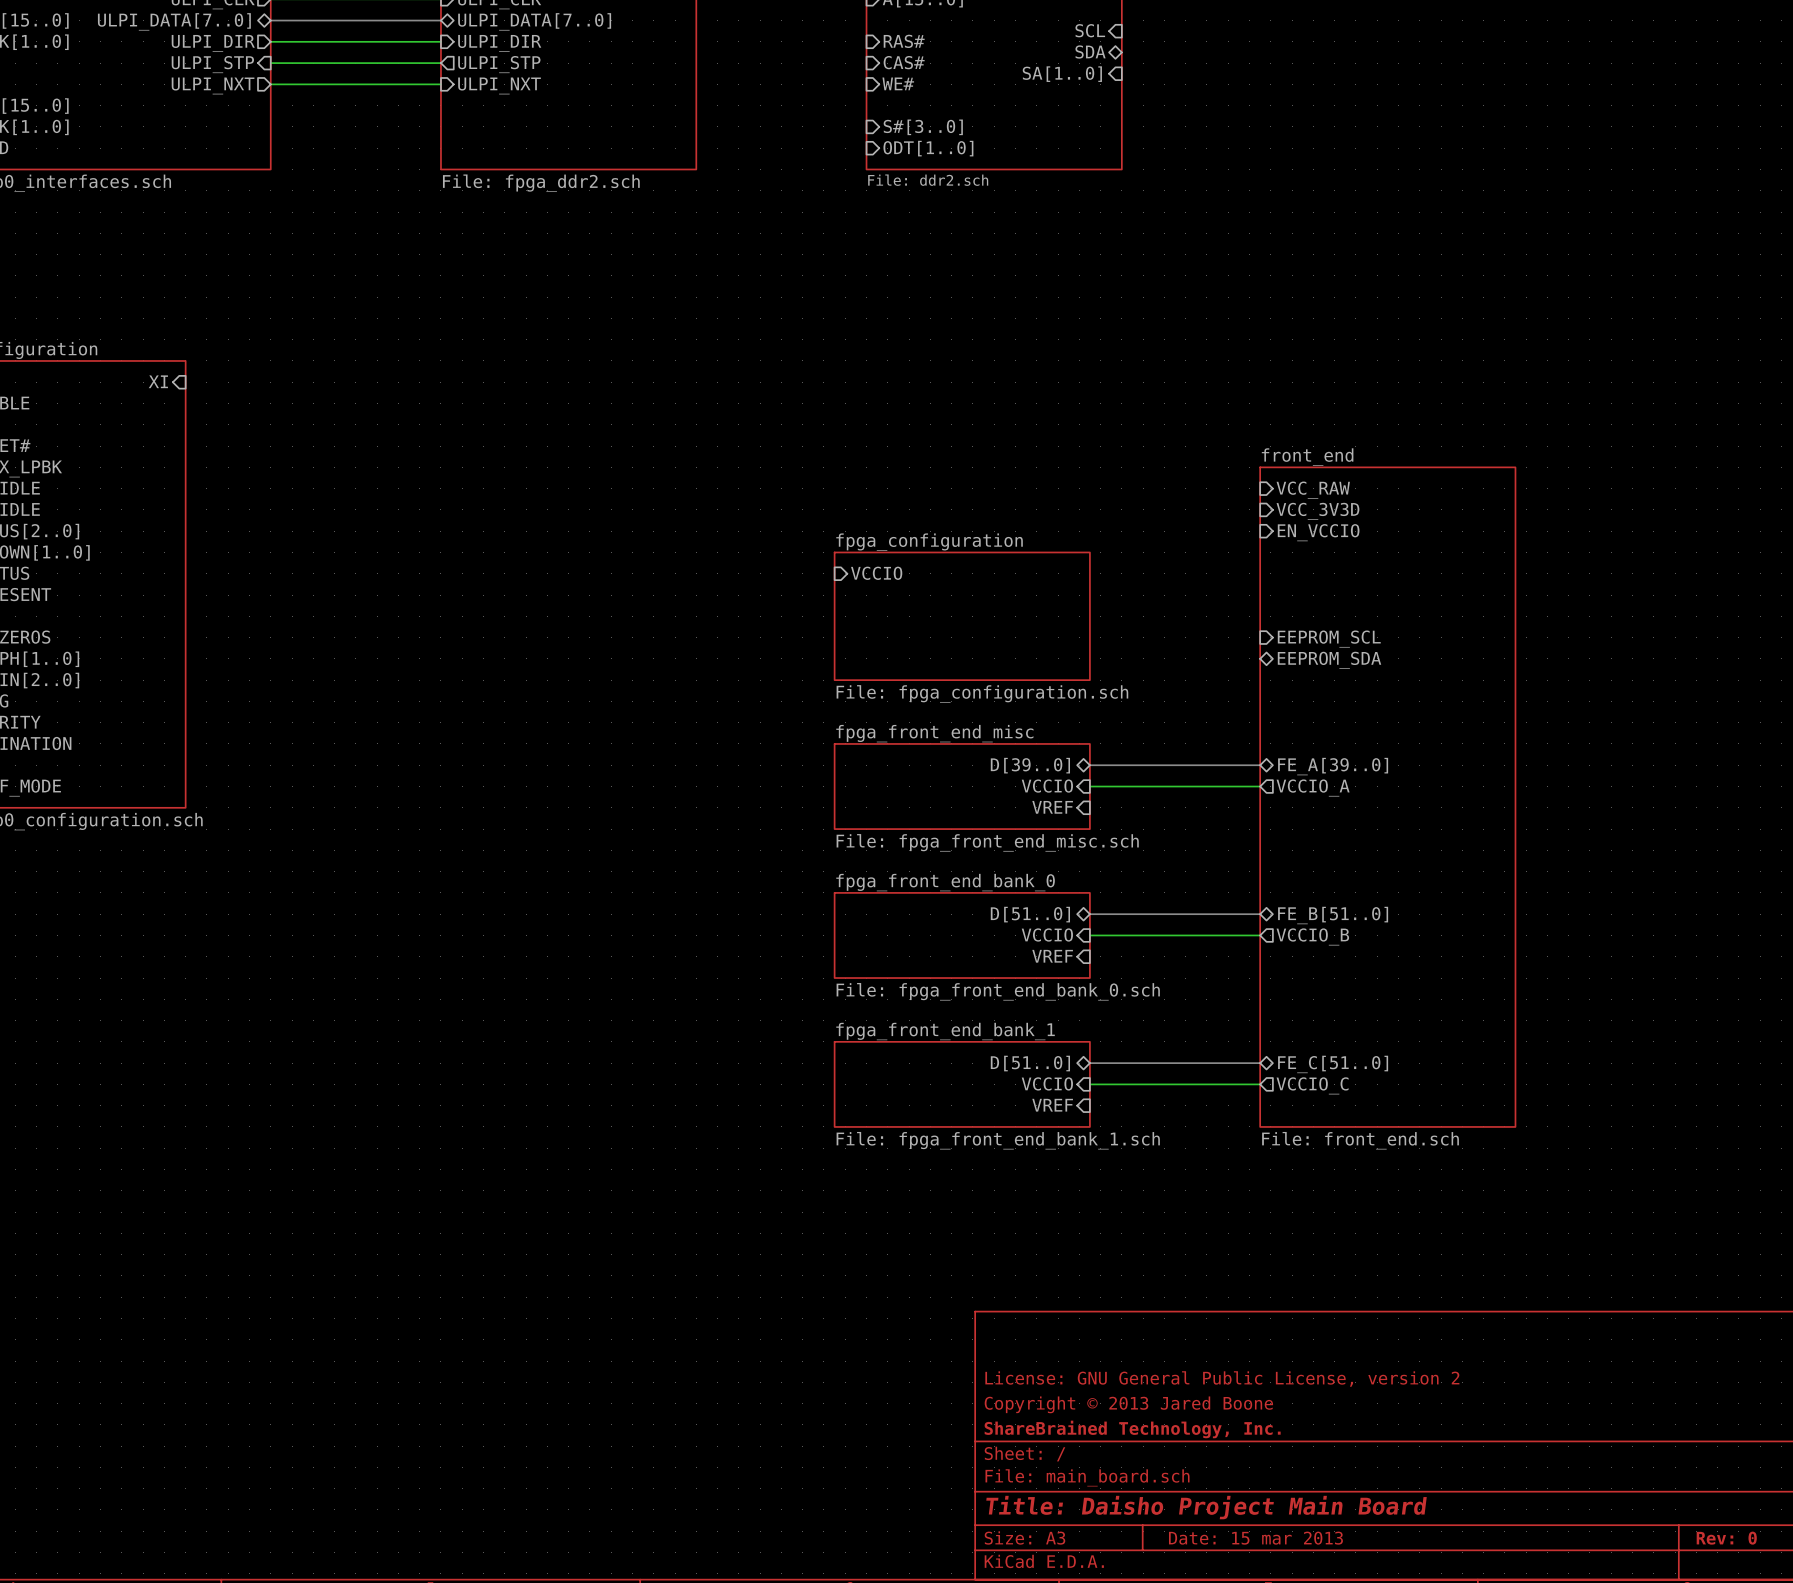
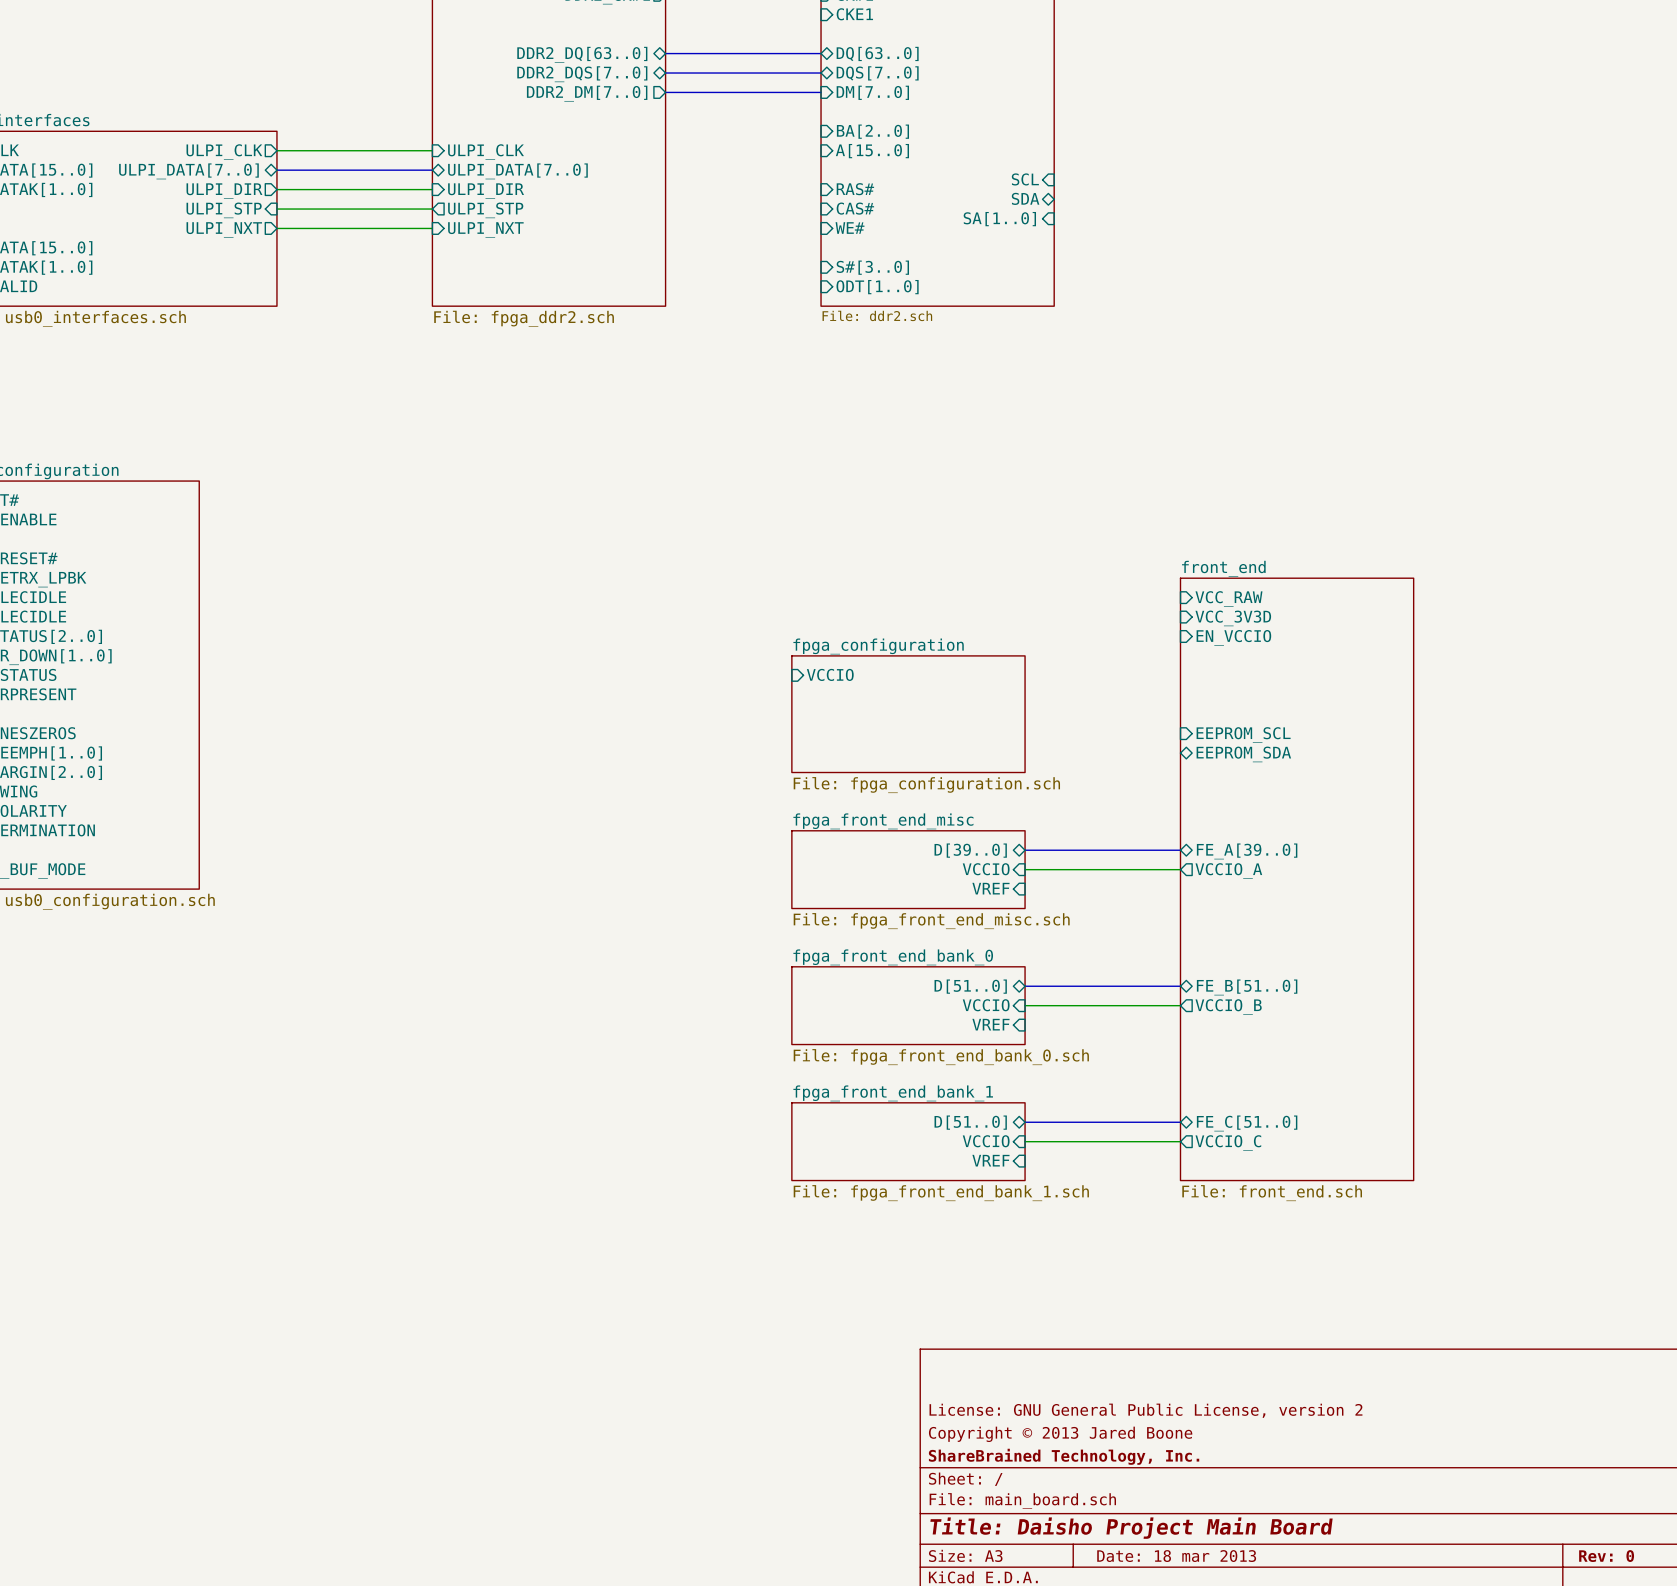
sheet pin: XI (158, 381) -> none
title block: Date: 15 mar 2013 (1255, 1538) -> Date: 18 mar 2013 (1176, 1556)

